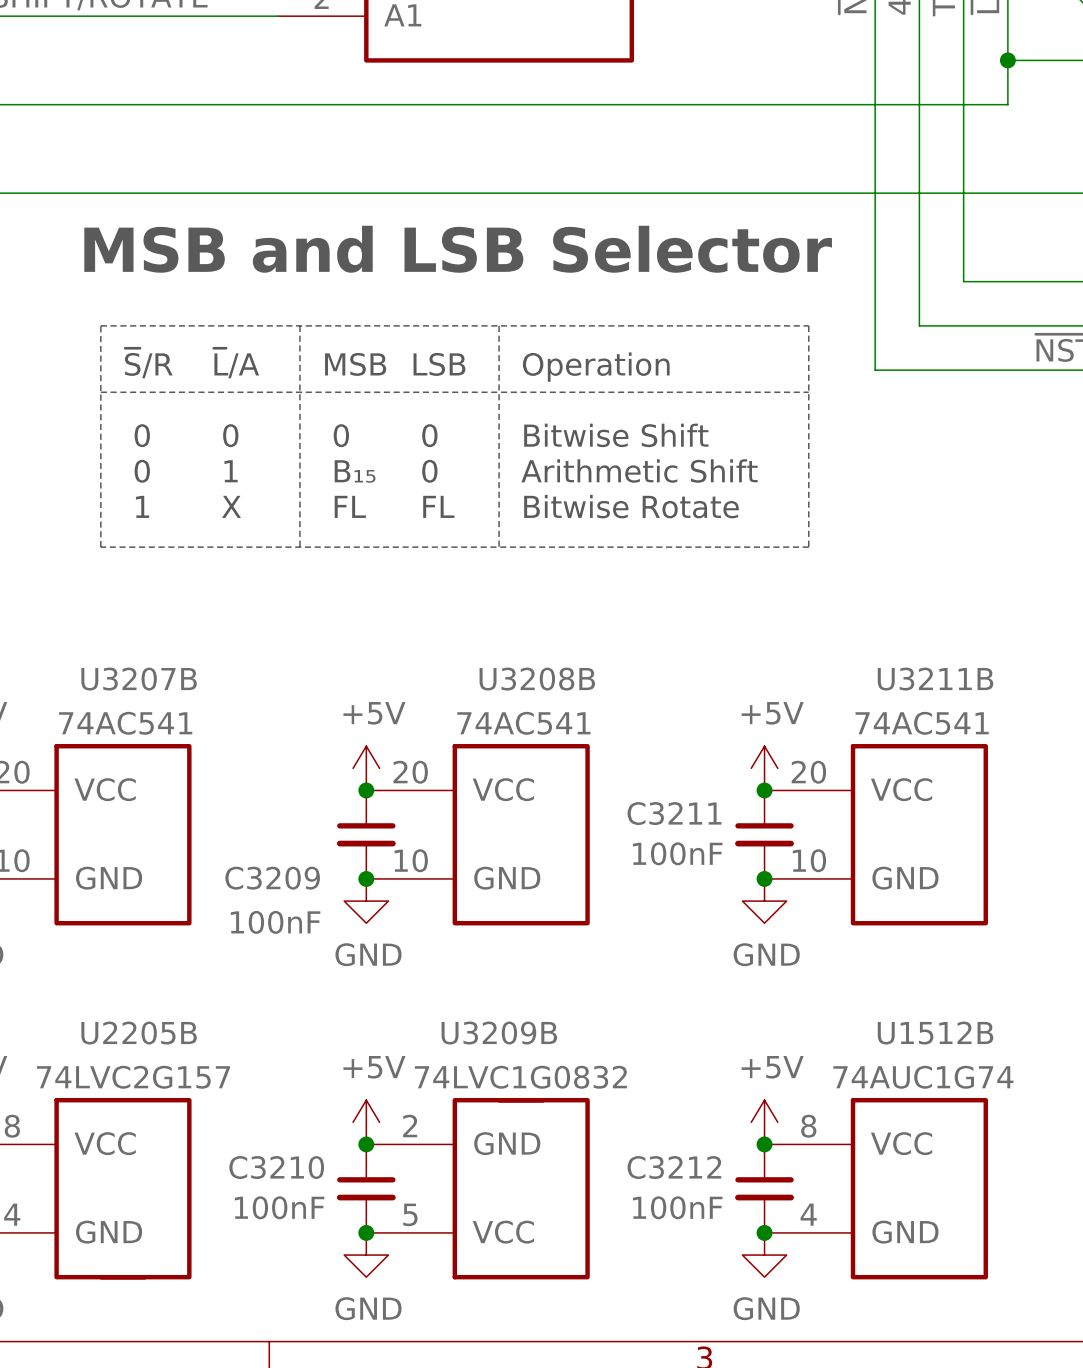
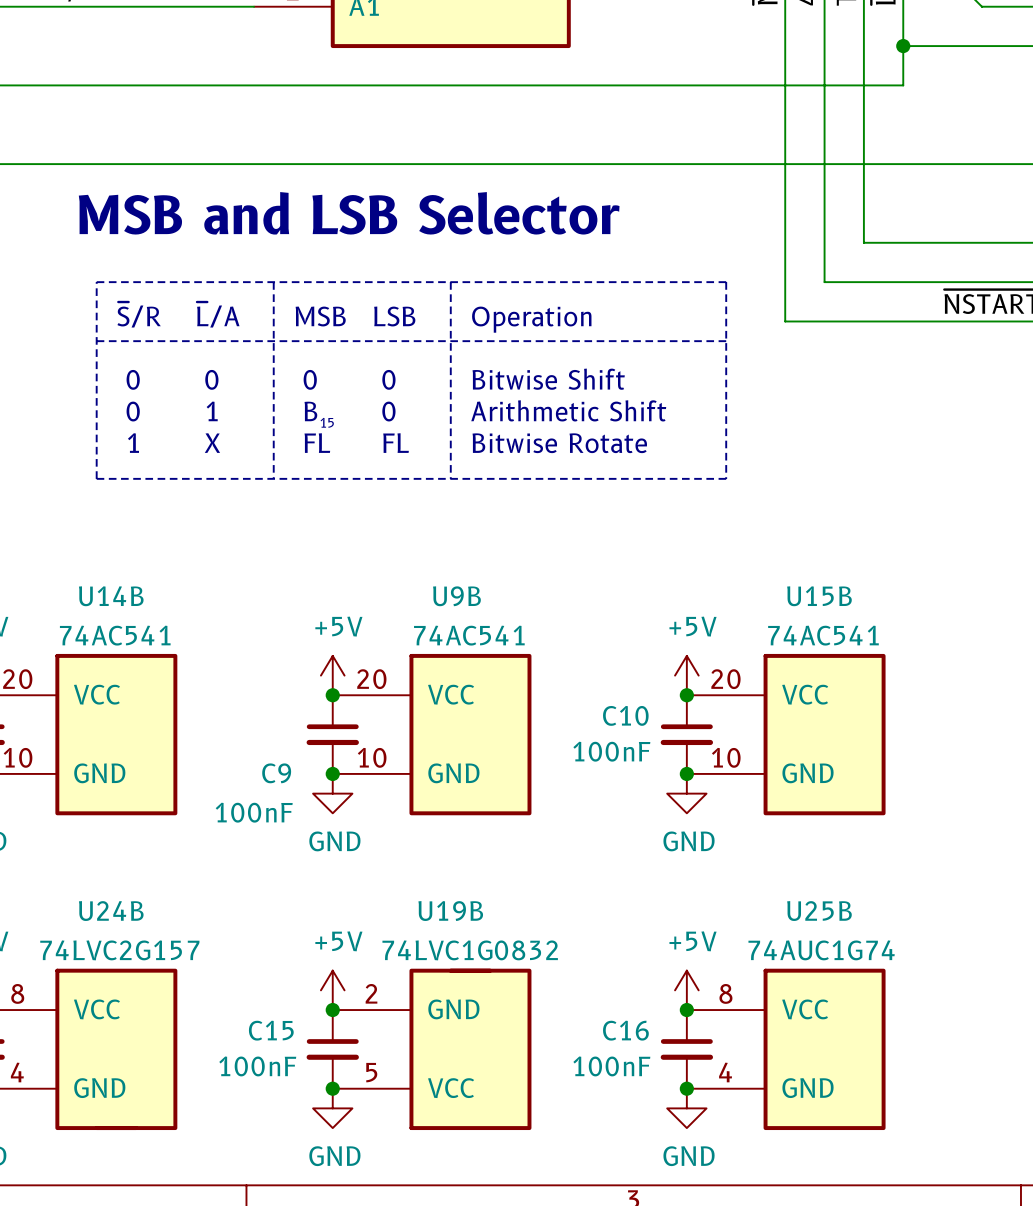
U3207B name: U3207B (139, 679) -> U14B (111, 596)
U3208B name: U3208B (537, 679) -> U9B (456, 596)
U3211B name: U3211B (935, 679) -> U15B (819, 596)
C3211 name: C3211 (674, 813) -> C10 (625, 715)
C3209 name: C3209 (272, 878) -> C9 (276, 773)
U2205B name: U2205B (139, 1033) -> U24B (111, 911)
U3209B name: U3209B (499, 1033) -> U19B (450, 911)
U1512B name: U1512B (935, 1033) -> U25B (819, 911)
C3210 name: C3210 (276, 1167) -> C15 (271, 1030)
C3212 name: C3212 (674, 1167) -> C16 (625, 1030)

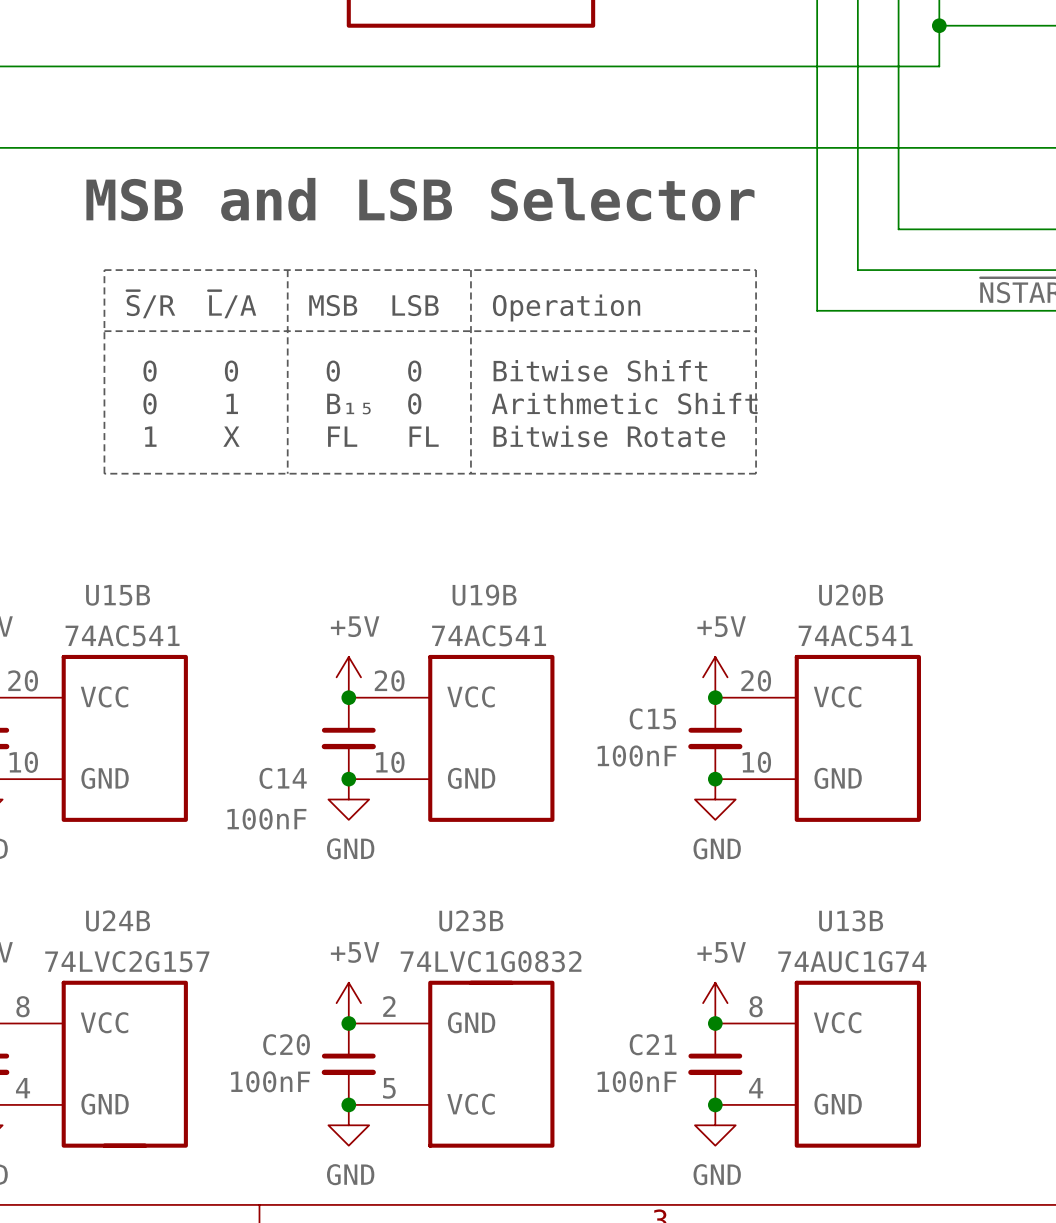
U14B name: U14B (111, 596) -> U15B (118, 595)
U9B name: U9B (456, 596) -> U19B (484, 595)
U15B name: U15B (819, 596) -> U20B (851, 595)
C10 name: C10 (625, 715) -> C15 (652, 718)
C9 name: C9 (276, 773) -> C14 (283, 778)
U19B name: U19B (450, 911) -> U23B (471, 920)
U25B name: U25B (819, 911) -> U13B (851, 920)
C15 name: C15 (271, 1030) -> C20 (286, 1044)
C16 name: C16 (625, 1030) -> C21 (653, 1044)

